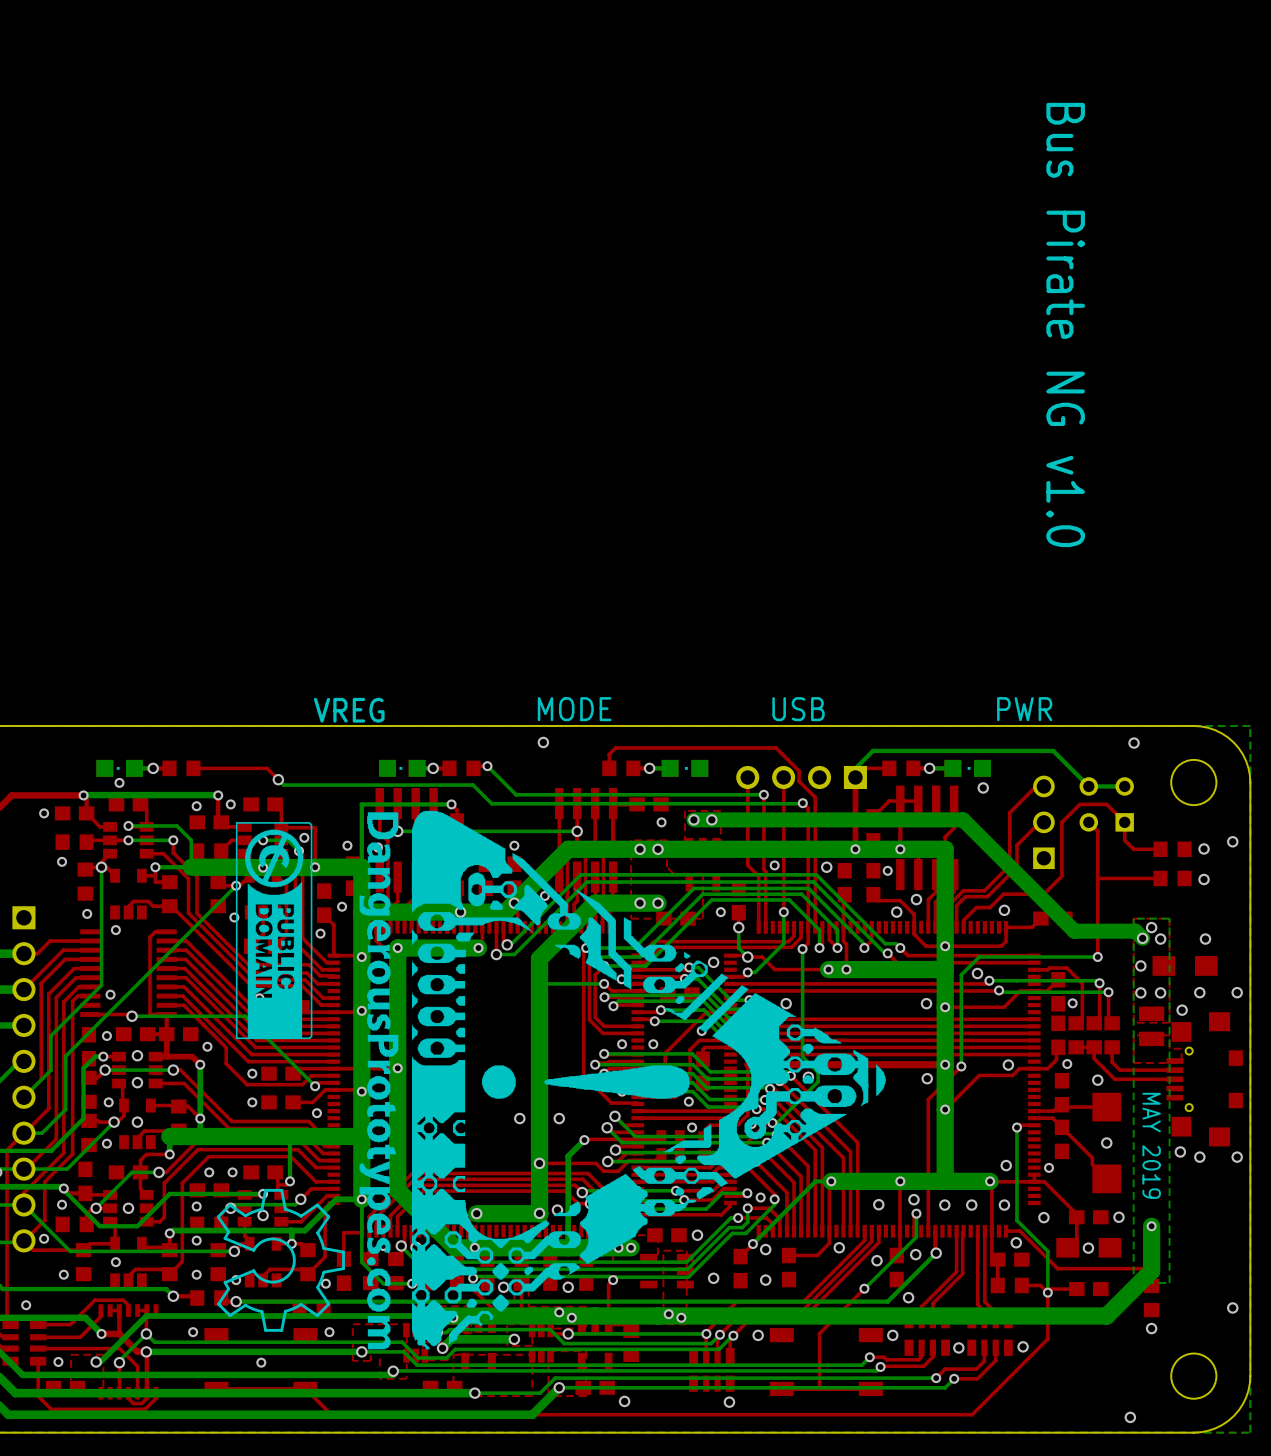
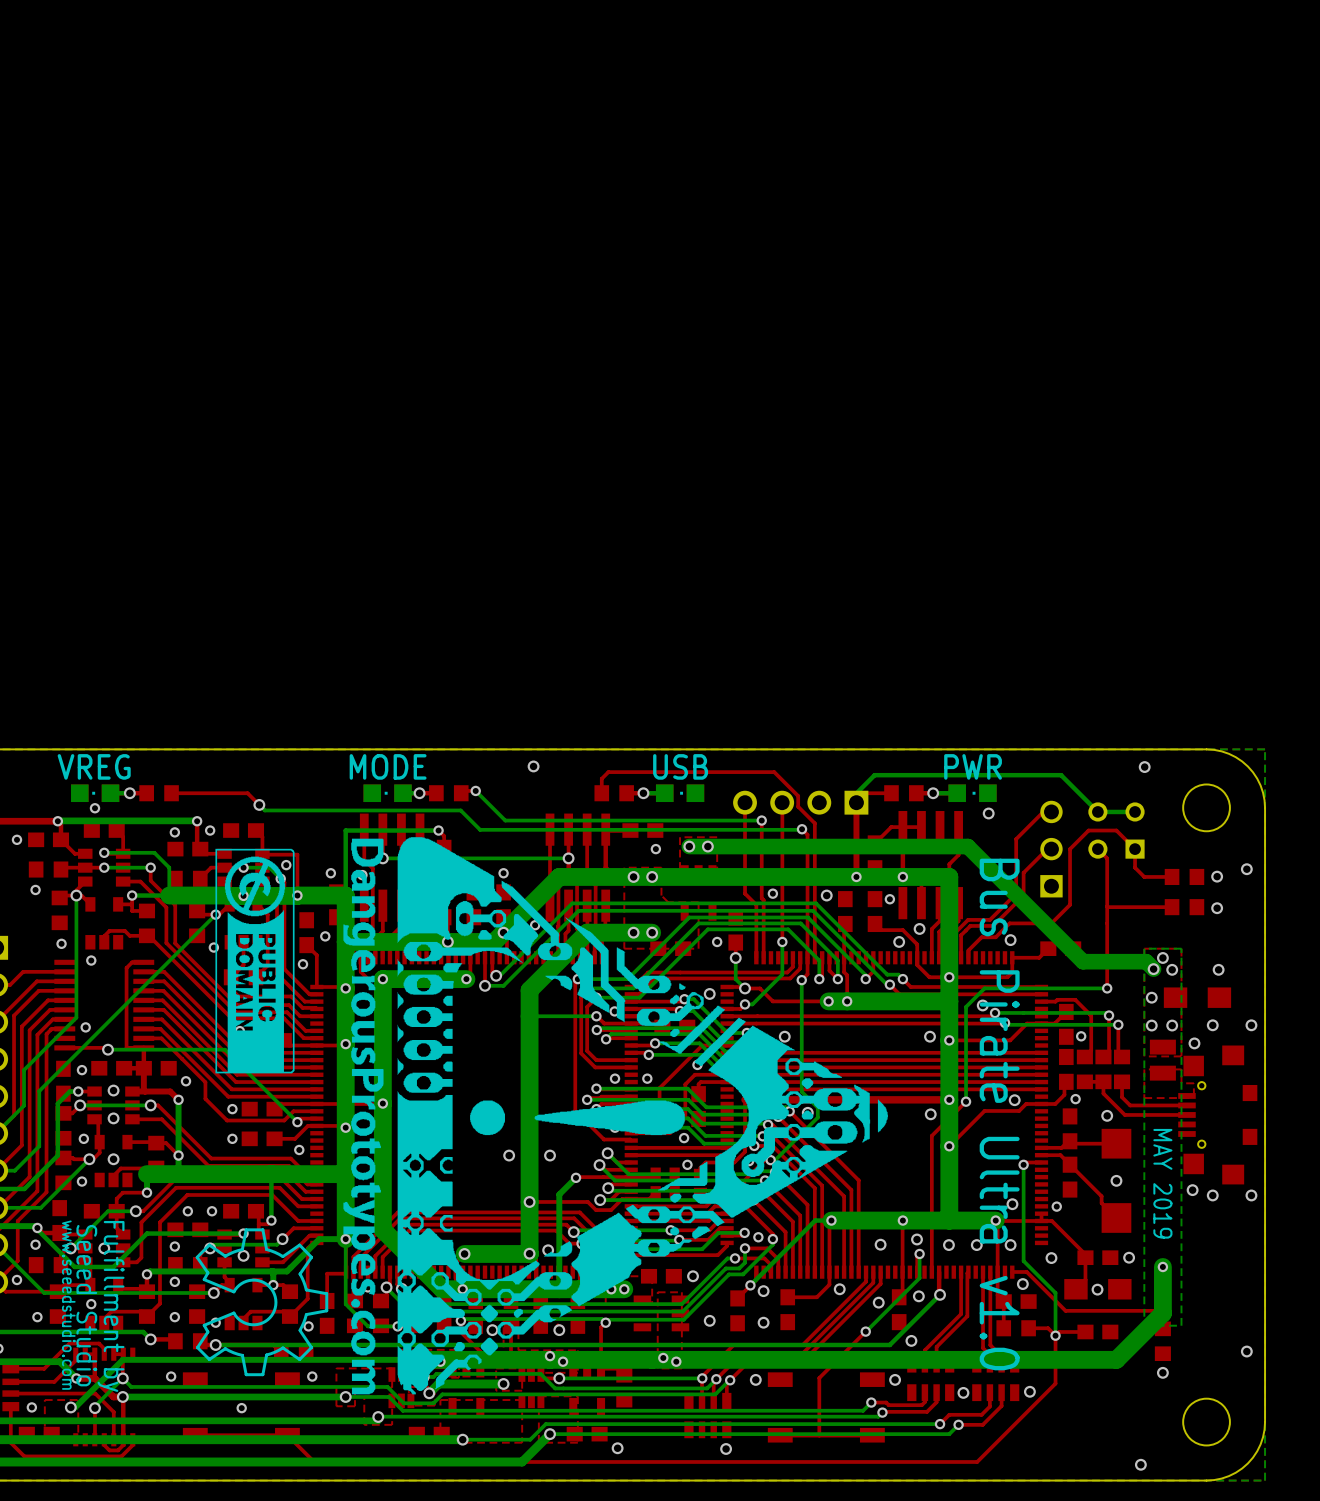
text: Bus Pirate NG v1.0 (1065, 324) -> none
text position: MODE (574, 709) -> MODE (388, 766)
text position: USB (798, 709) -> USB (680, 766)
text position: PWR (1024, 709) -> PWR (973, 766)
text position: VREG (349, 710) -> VREG (94, 766)
text: none -> Bus Pirate Ultra v1.0 (999, 1114)
text: none -> www.seeedstudio.com (68, 1305)
text: none -> Seeed Studio (86, 1305)
text: none -> Fulfillment by (111, 1306)

